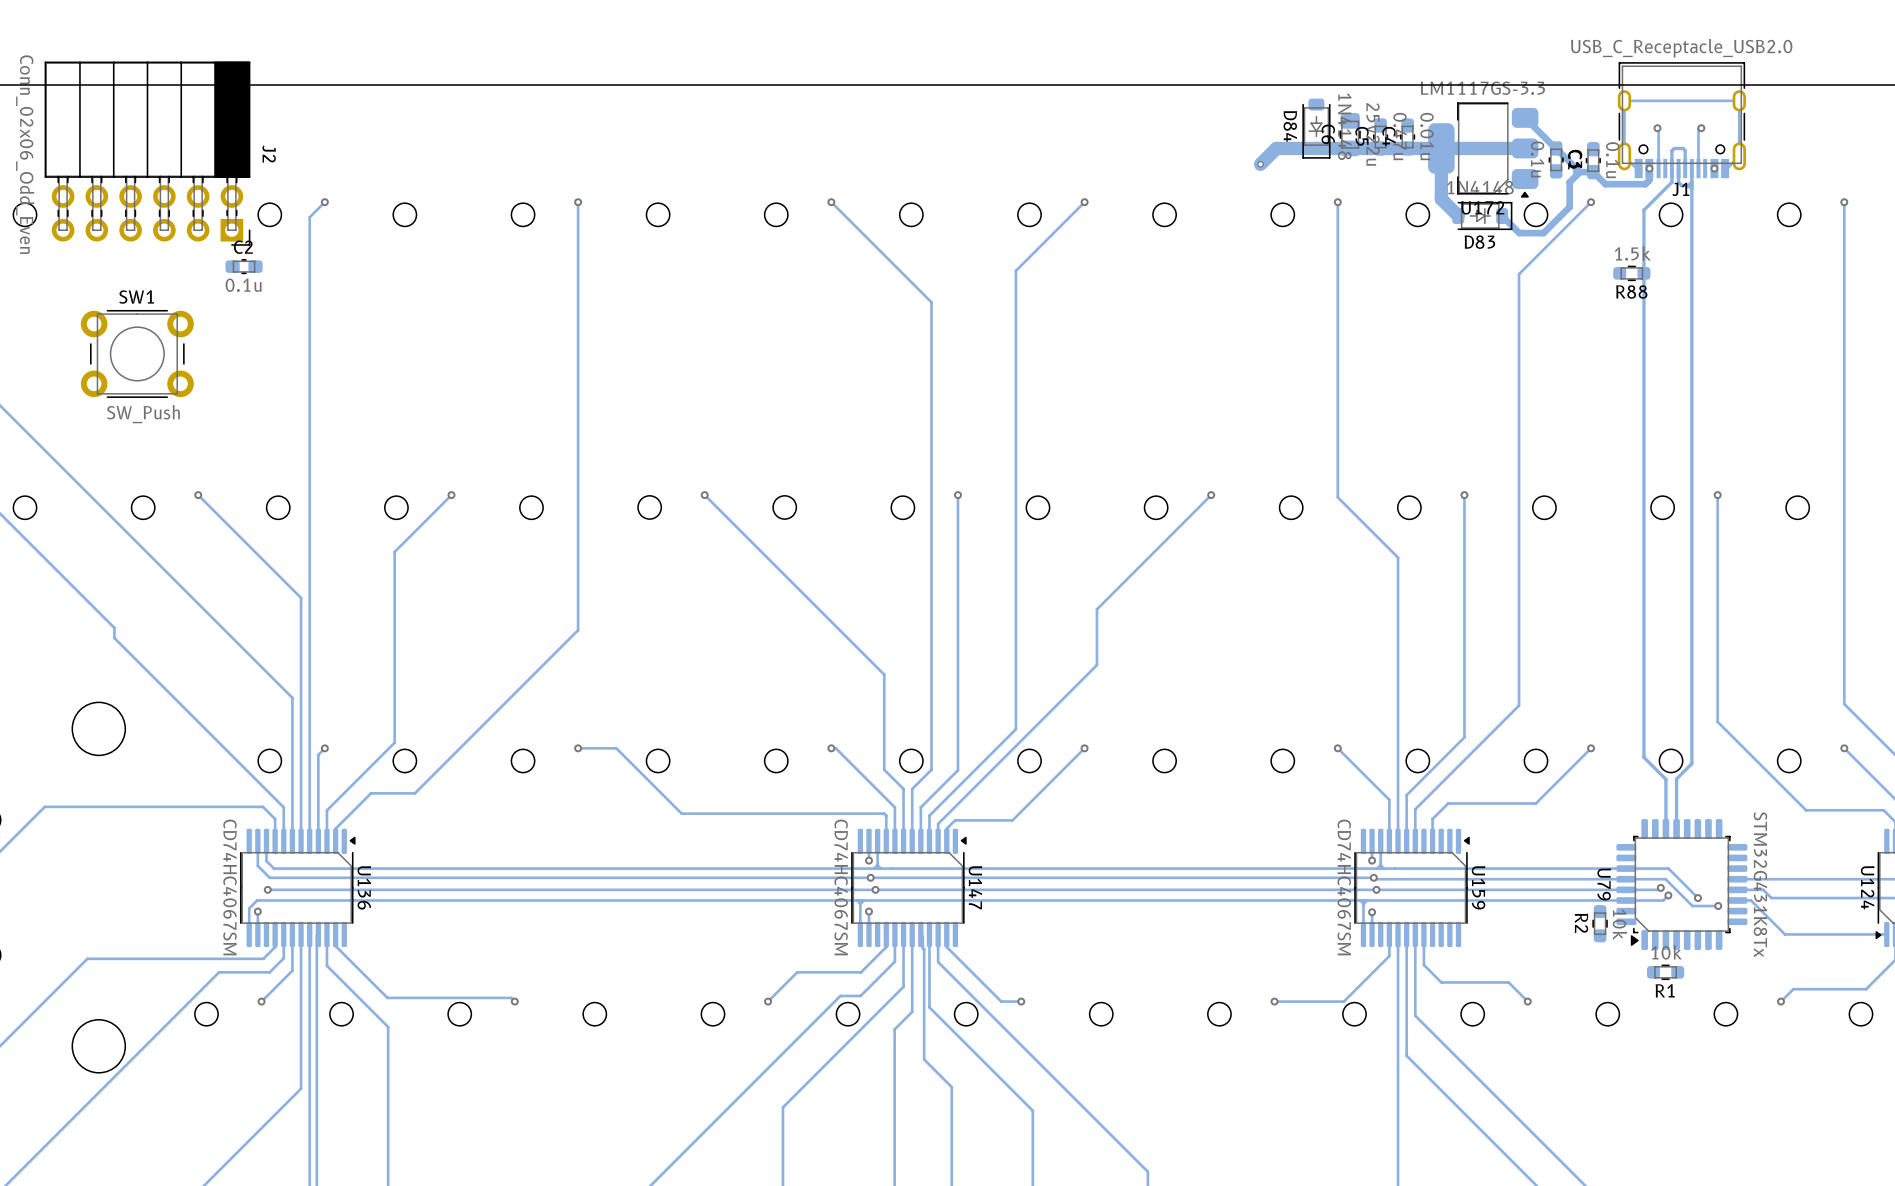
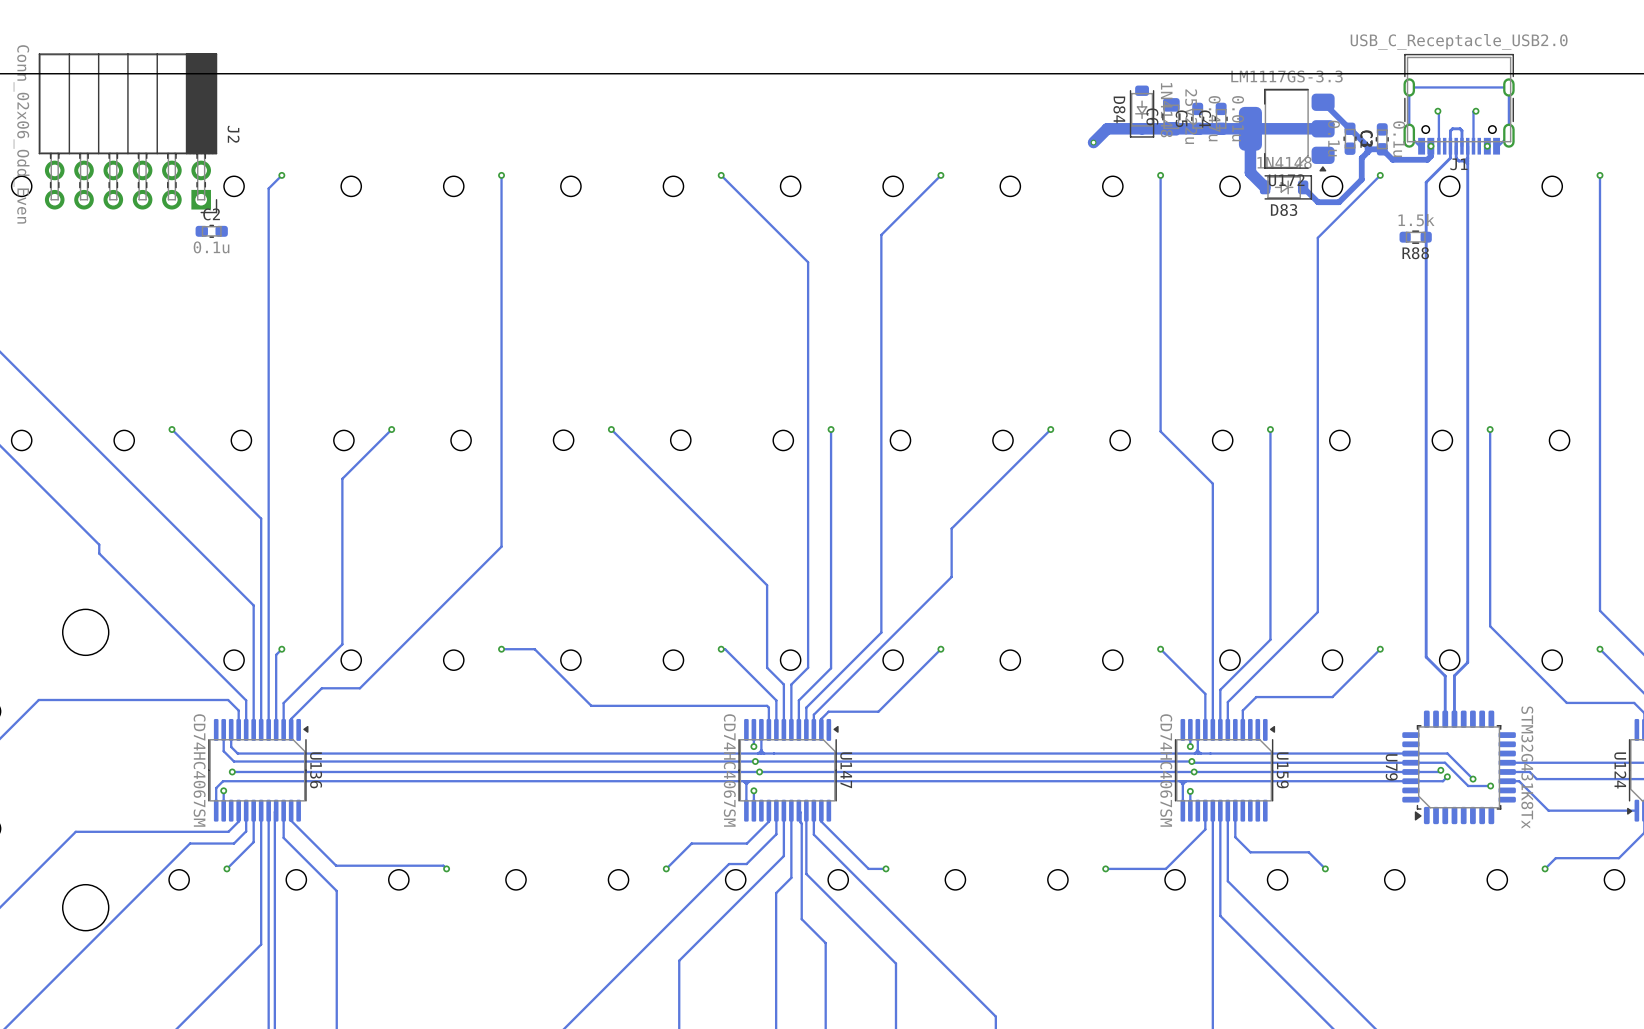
SW1: SW_Push (137, 353) -> none
R2: 10k (1600, 923) -> none
R1: 10k (1665, 972) -> none

